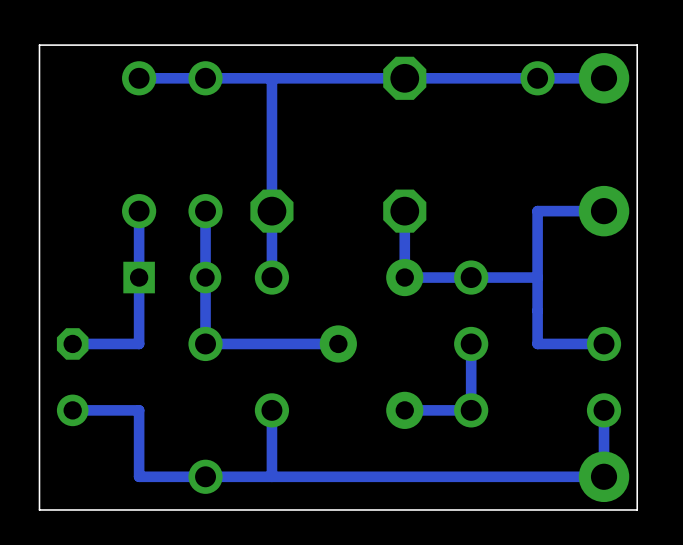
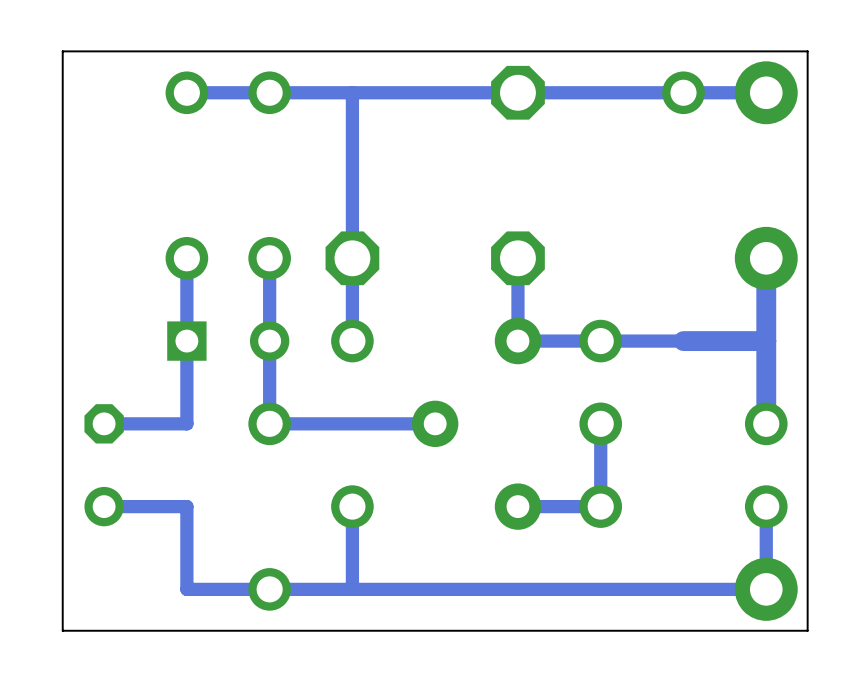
track: (604, 211) (537, 211) (537, 343) (604, 343) -> (766, 258) (766, 423)
track: none -> (766, 341) (683, 341)

